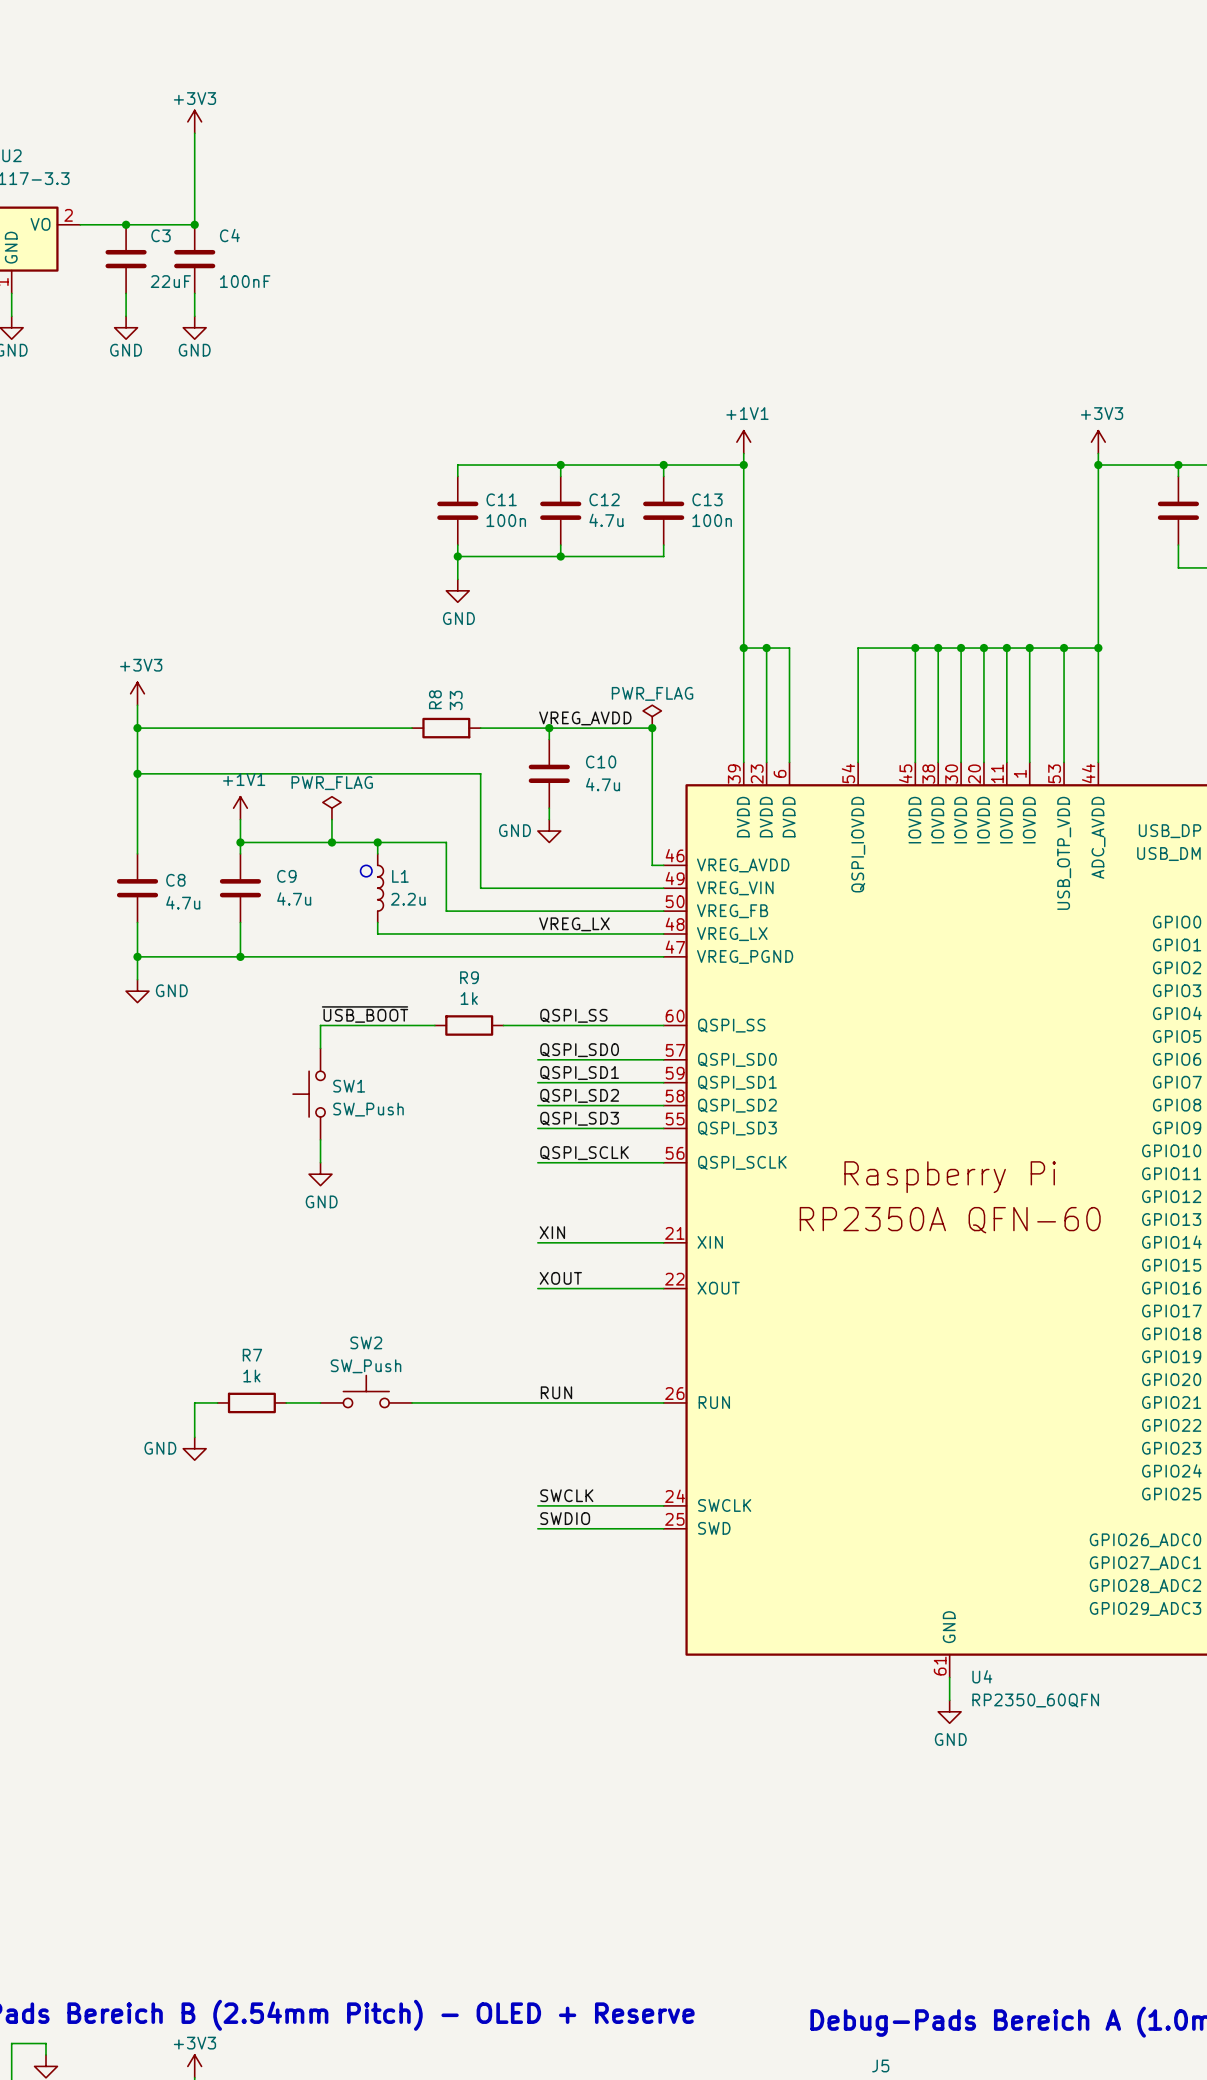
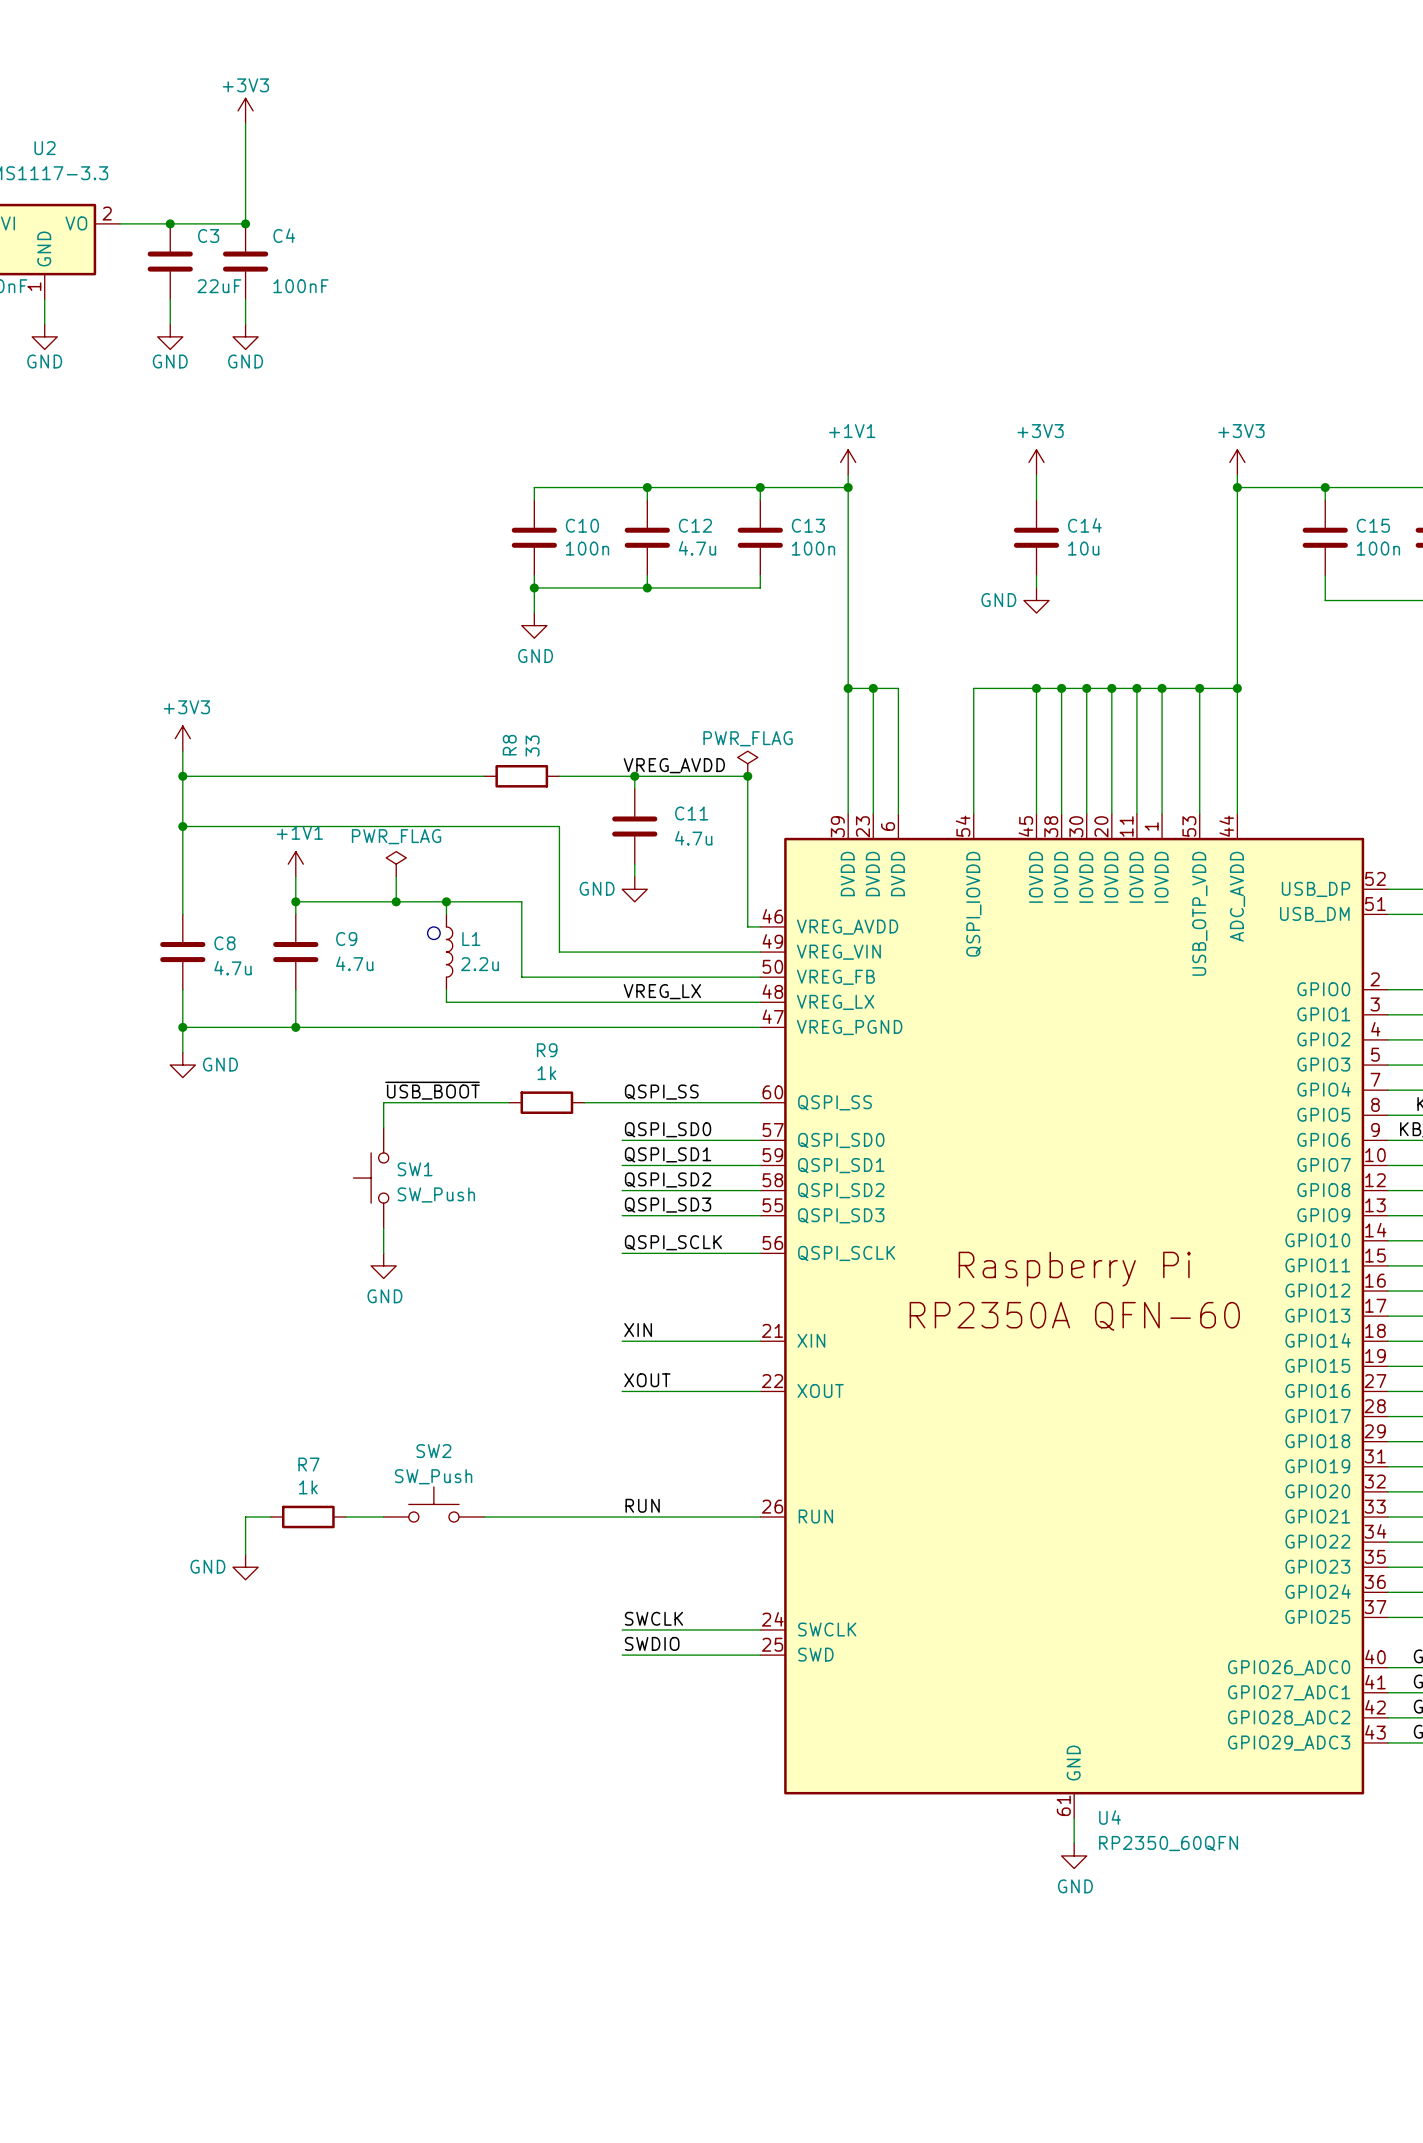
power symbol: none -> +3V3 (1036, 462)
wire: none -> (1036, 474) (1036, 500)
C11 name: C11 (501, 499) -> C10 (582, 525)
C14: none -> 10u (1036, 537)
wire: none -> (1036, 575) (1036, 587)
power symbol: none -> GND (1036, 600)
C10 name: C10 (601, 761) -> C11 (691, 813)

